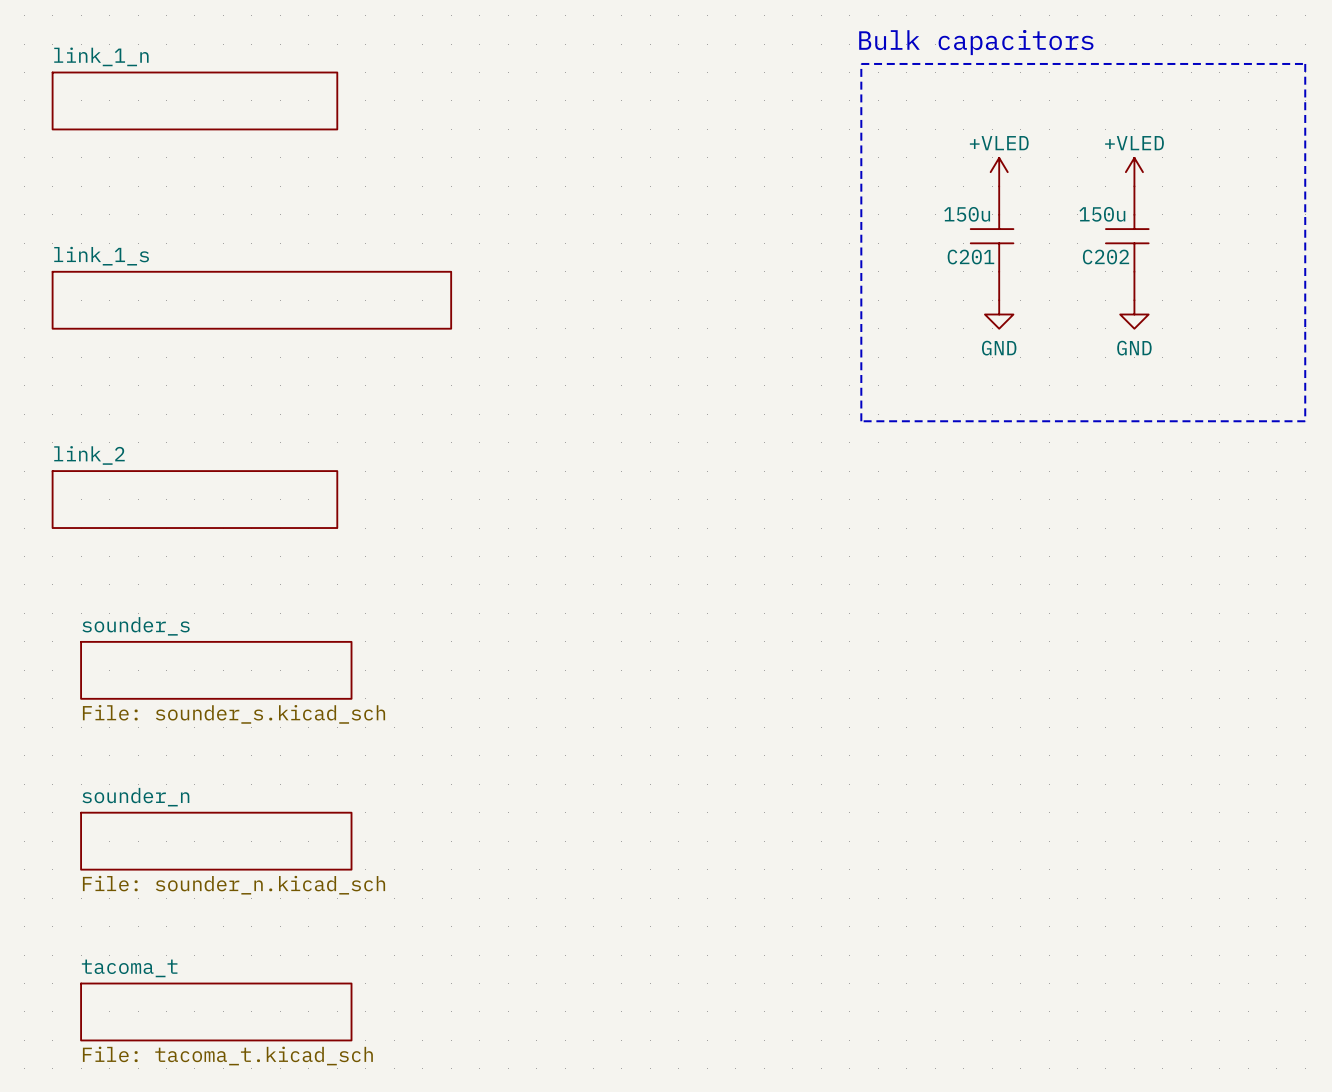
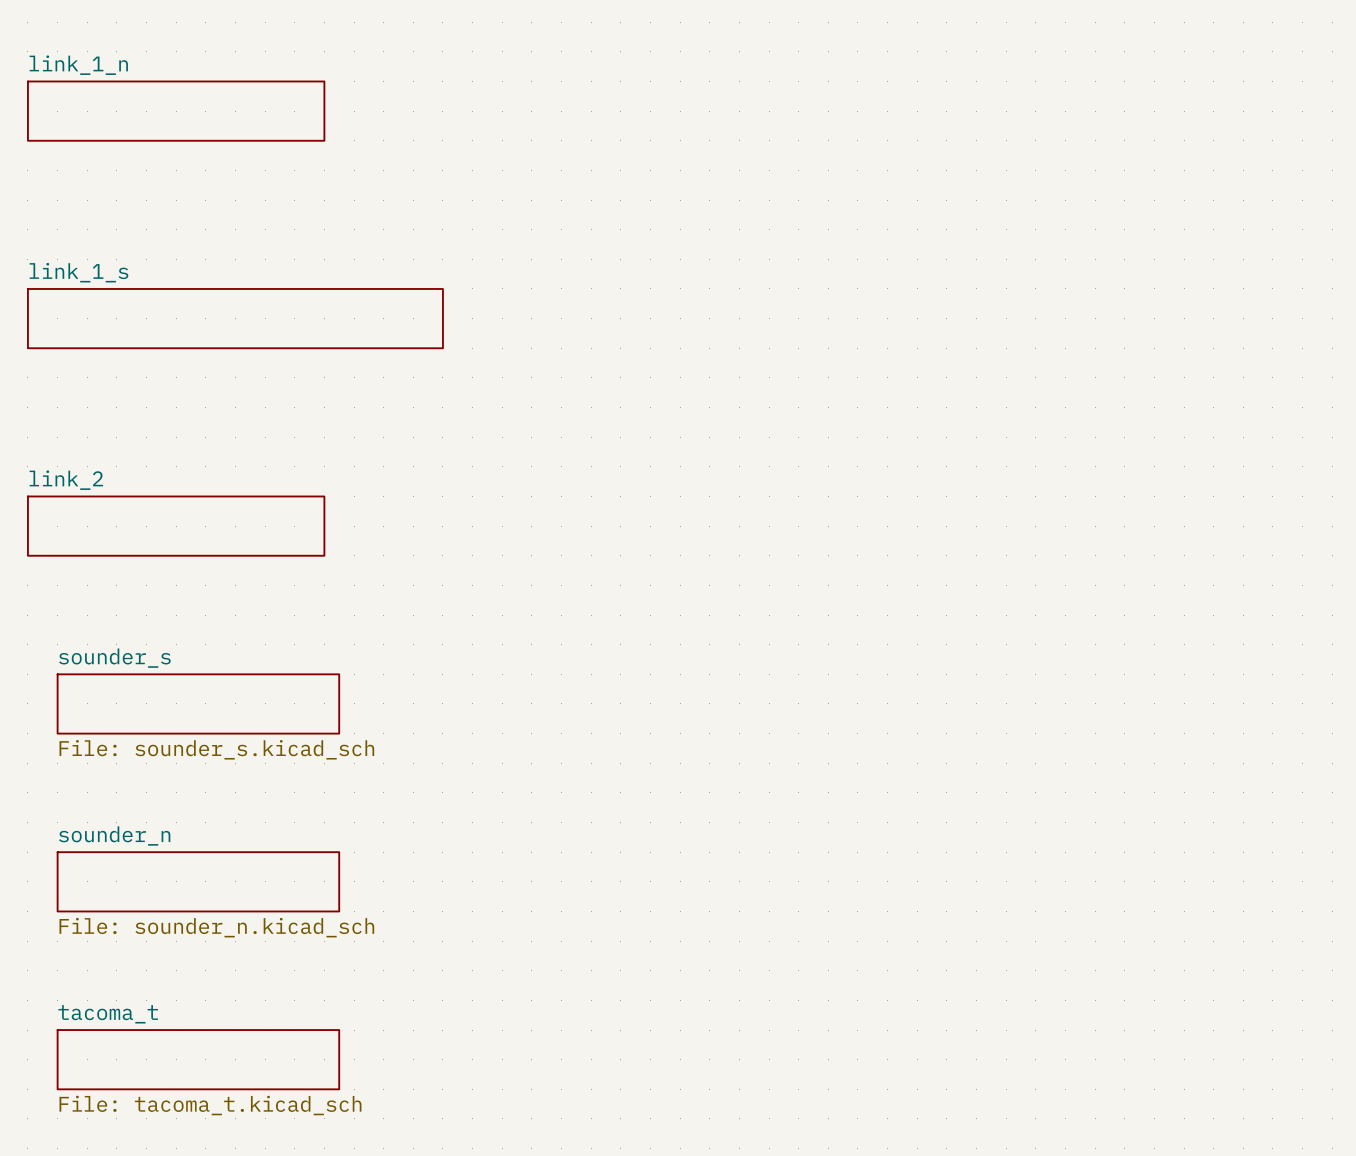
text: Bulk capacitors (976, 42) -> none
line: (861, 63) (1305, 63) (1305, 421) (861, 421) (861, 63) -> none
power symbol: +VLED (999, 172) -> none
power symbol: +VLED (1134, 172) -> none
C201: 150u (992, 243) -> none
C202: 150u (1127, 243) -> none
power symbol: GND (999, 314) -> none
power symbol: GND (1134, 314) -> none

